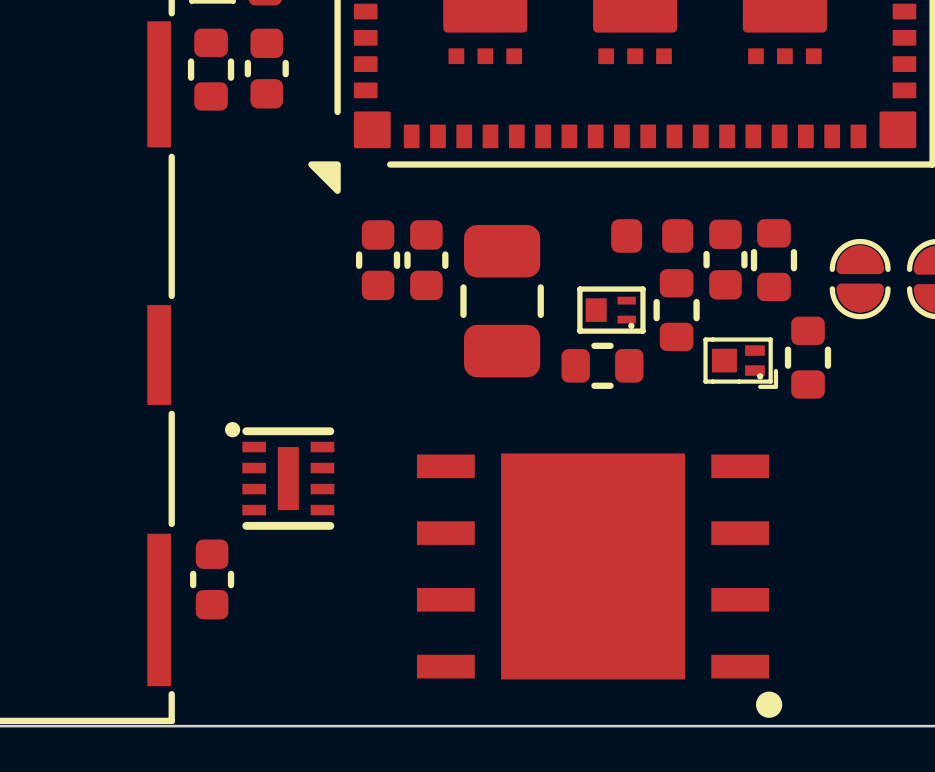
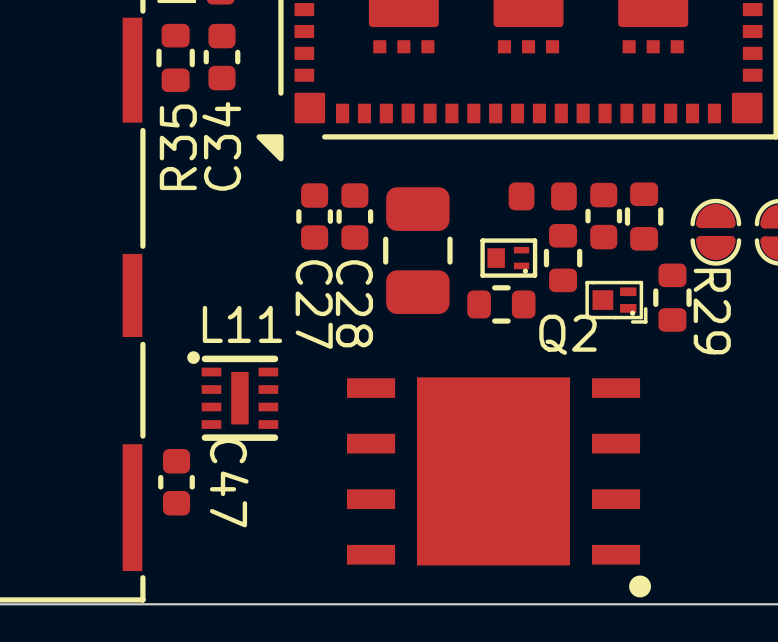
C34 name: none -> C34 (221, 146)
R35 name: none -> R35 (178, 147)
C27 name: none -> C27 (314, 304)
C28 name: none -> C28 (354, 303)
R29 name: none -> R29 (712, 311)
L11 name: none -> L11 (242, 324)
Q2 name: none -> Q2 (567, 334)
C47 name: none -> C47 (229, 483)

